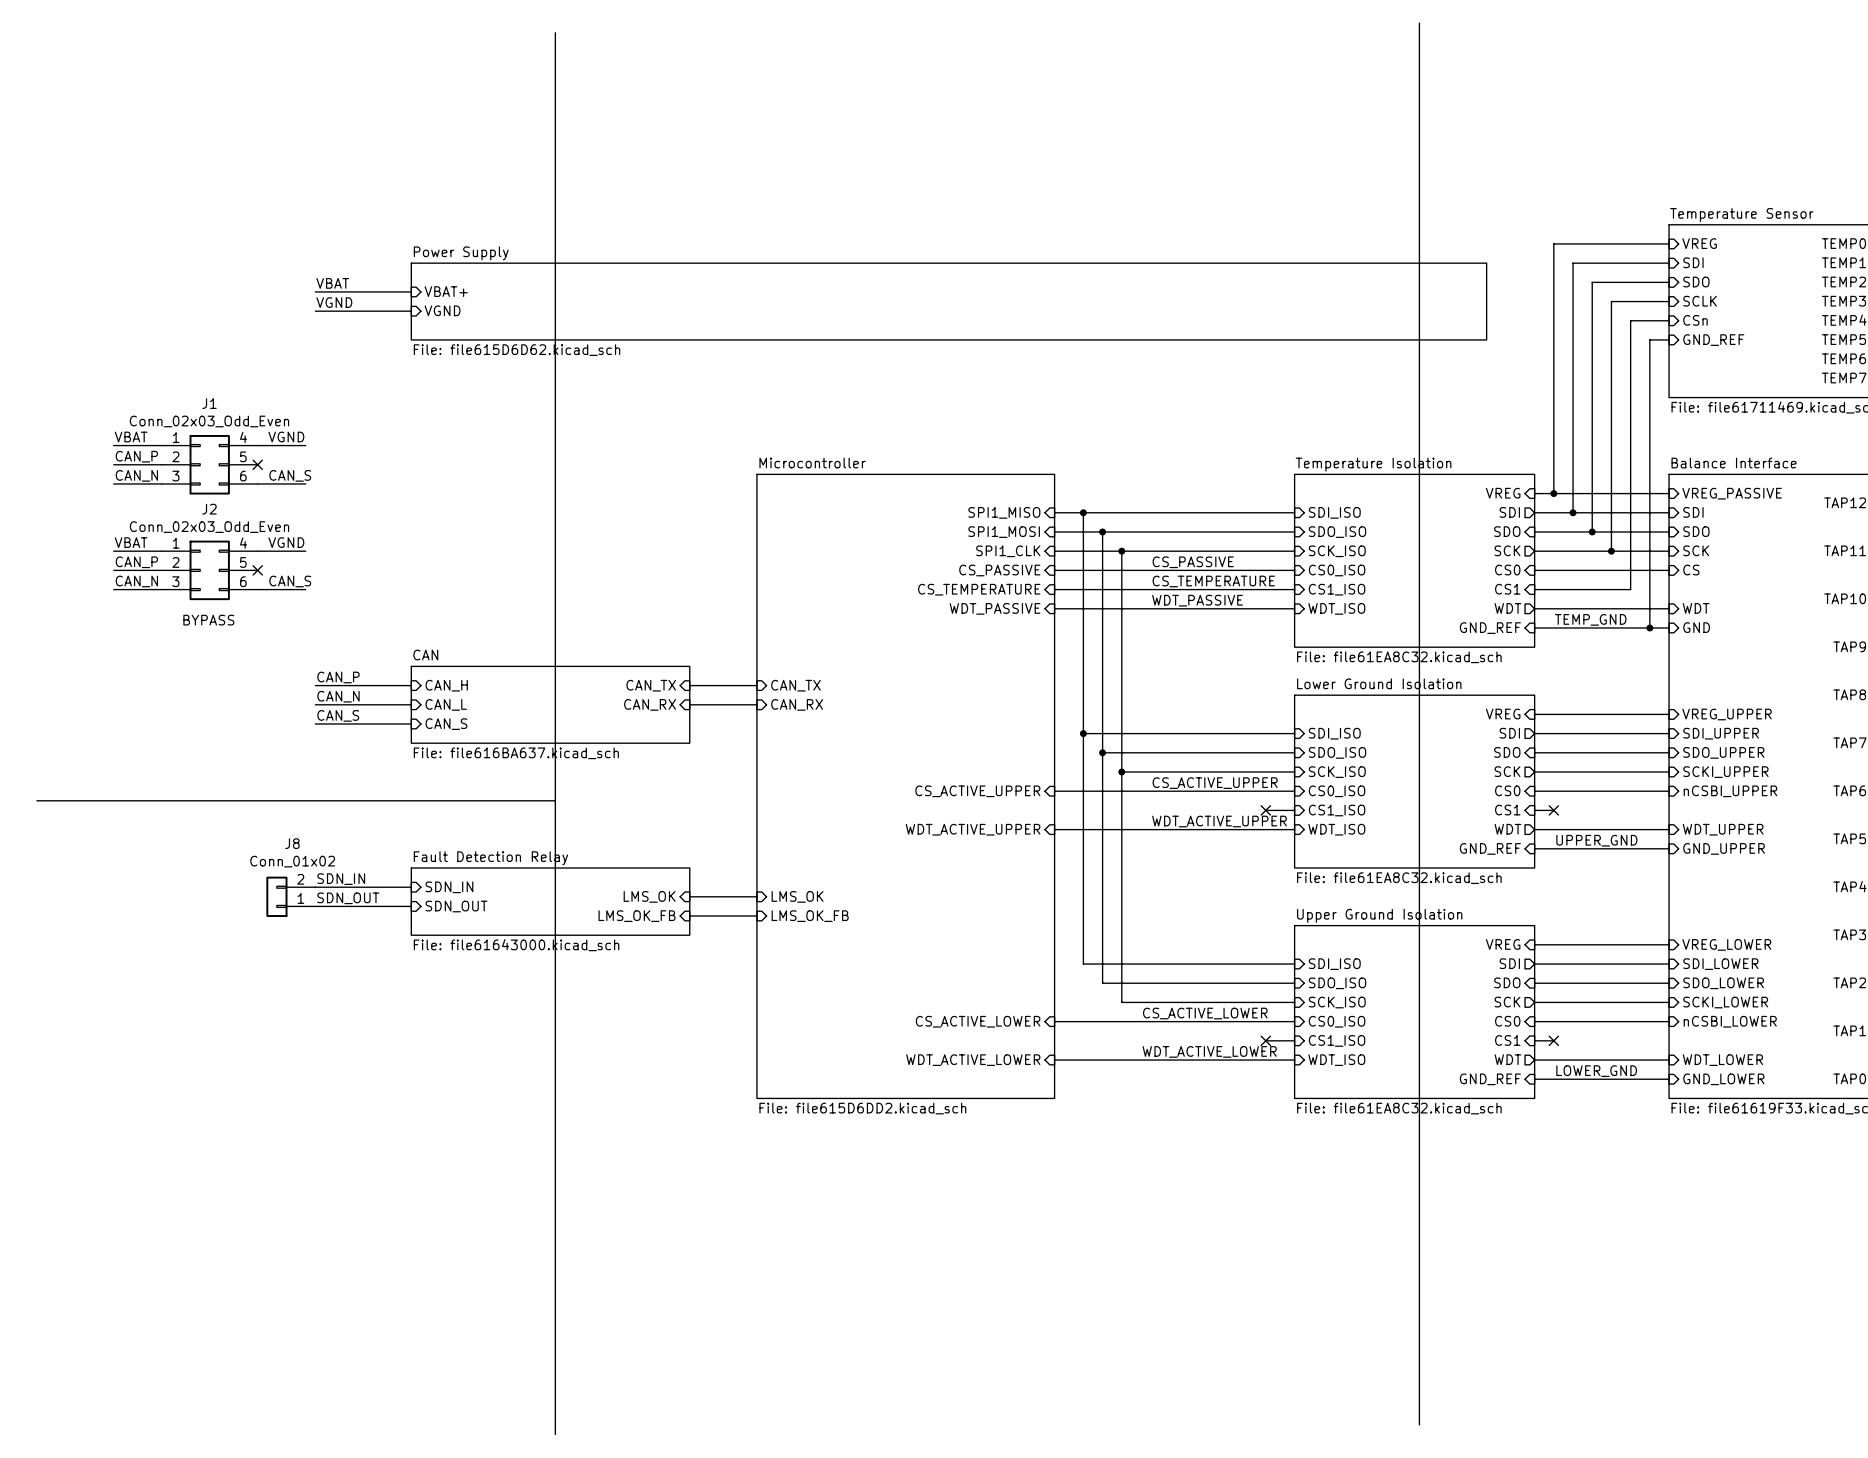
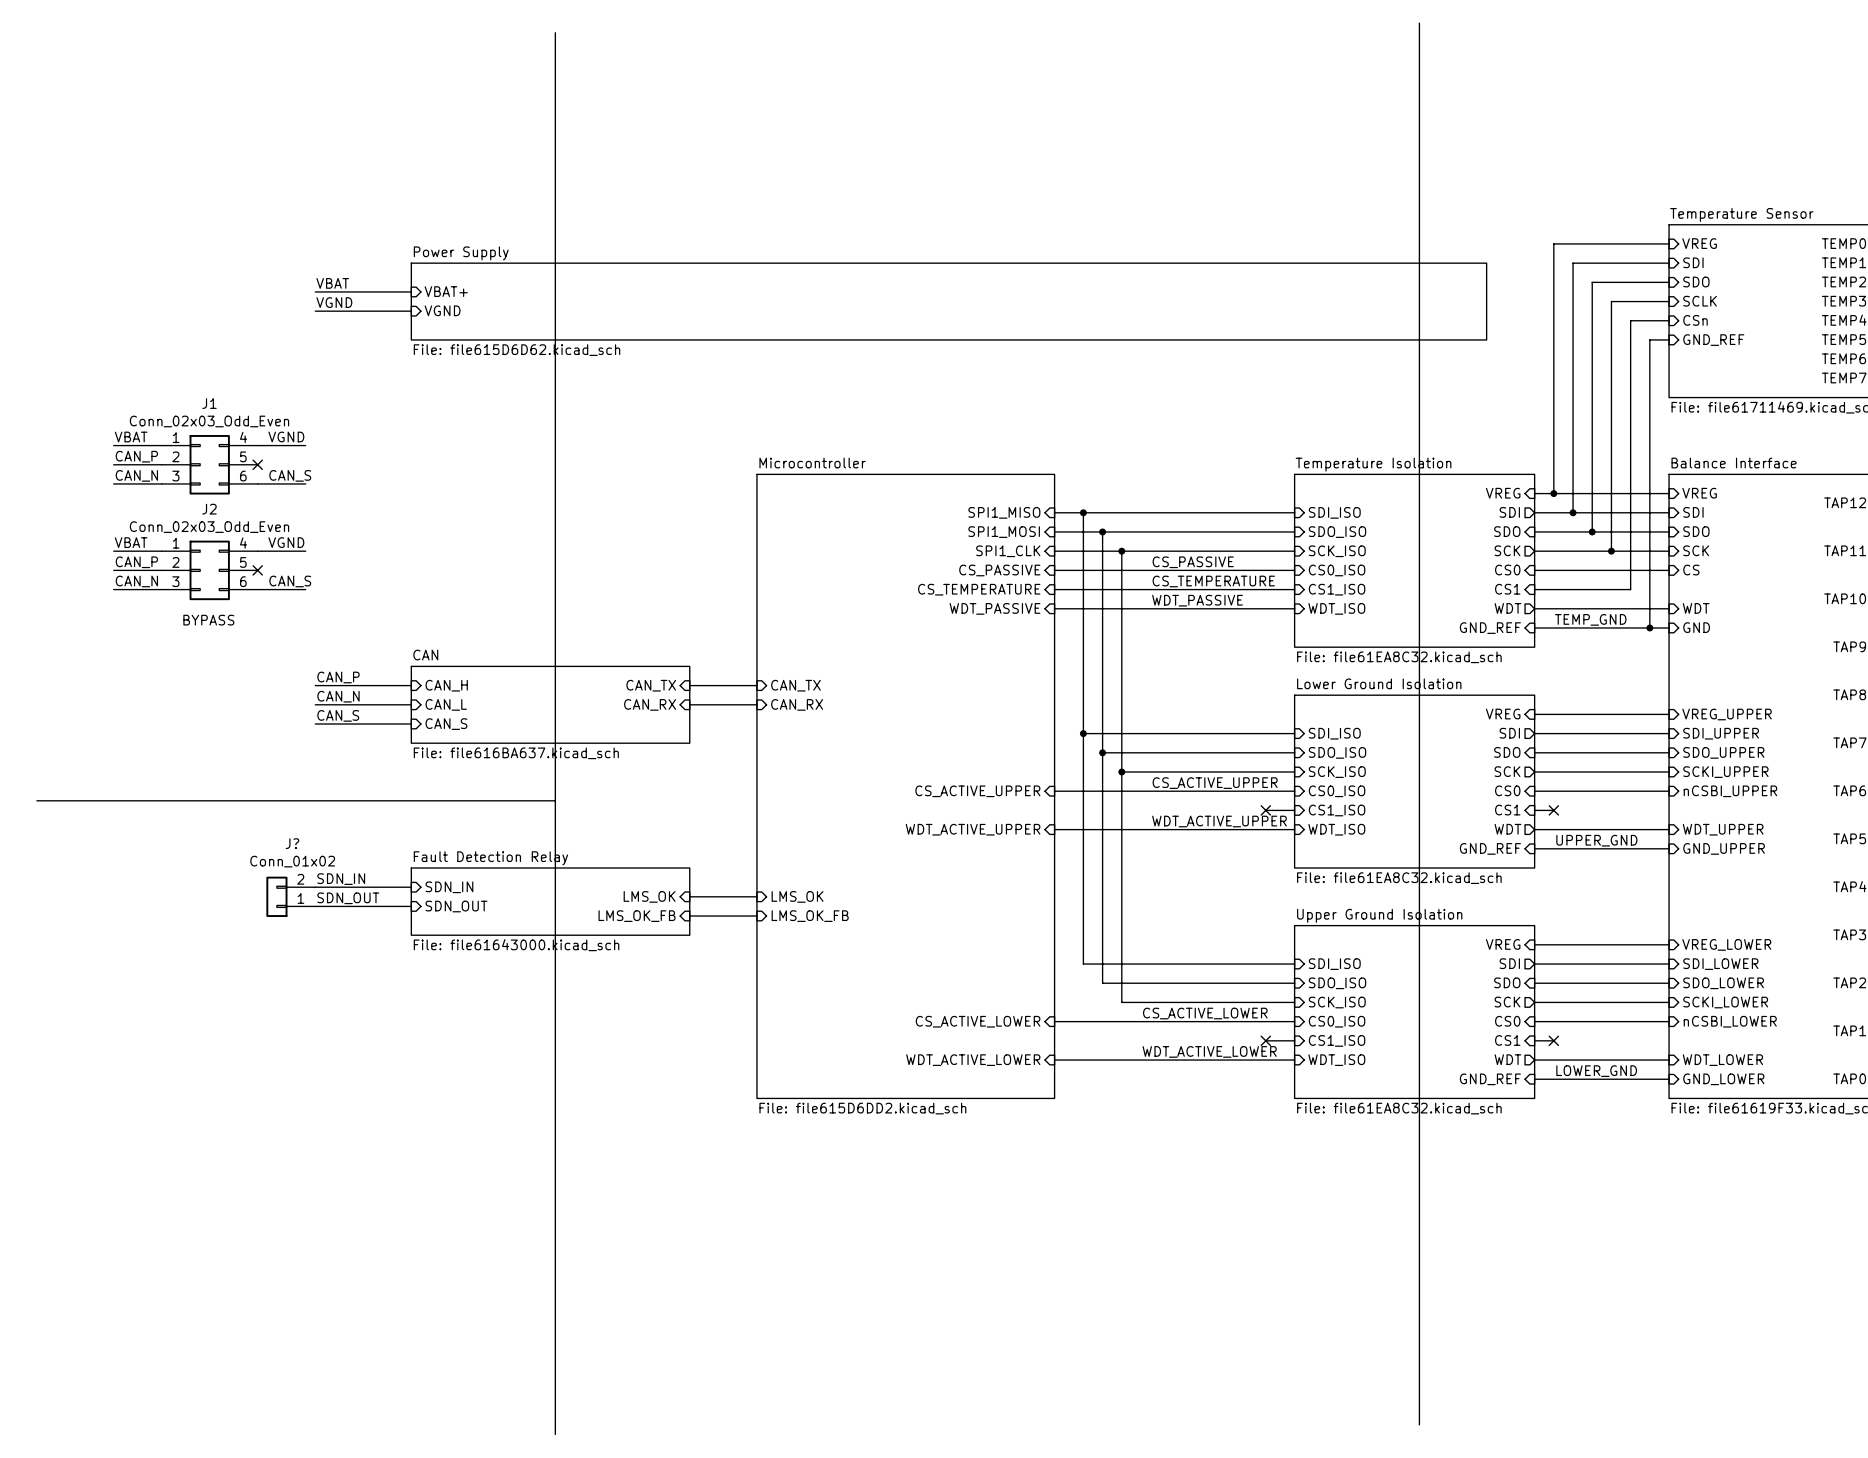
sheet pin: VREG_PASSIVE (1732, 493) -> VREG (1699, 493)
J8 name: J8 (292, 843) -> J? (292, 843)

